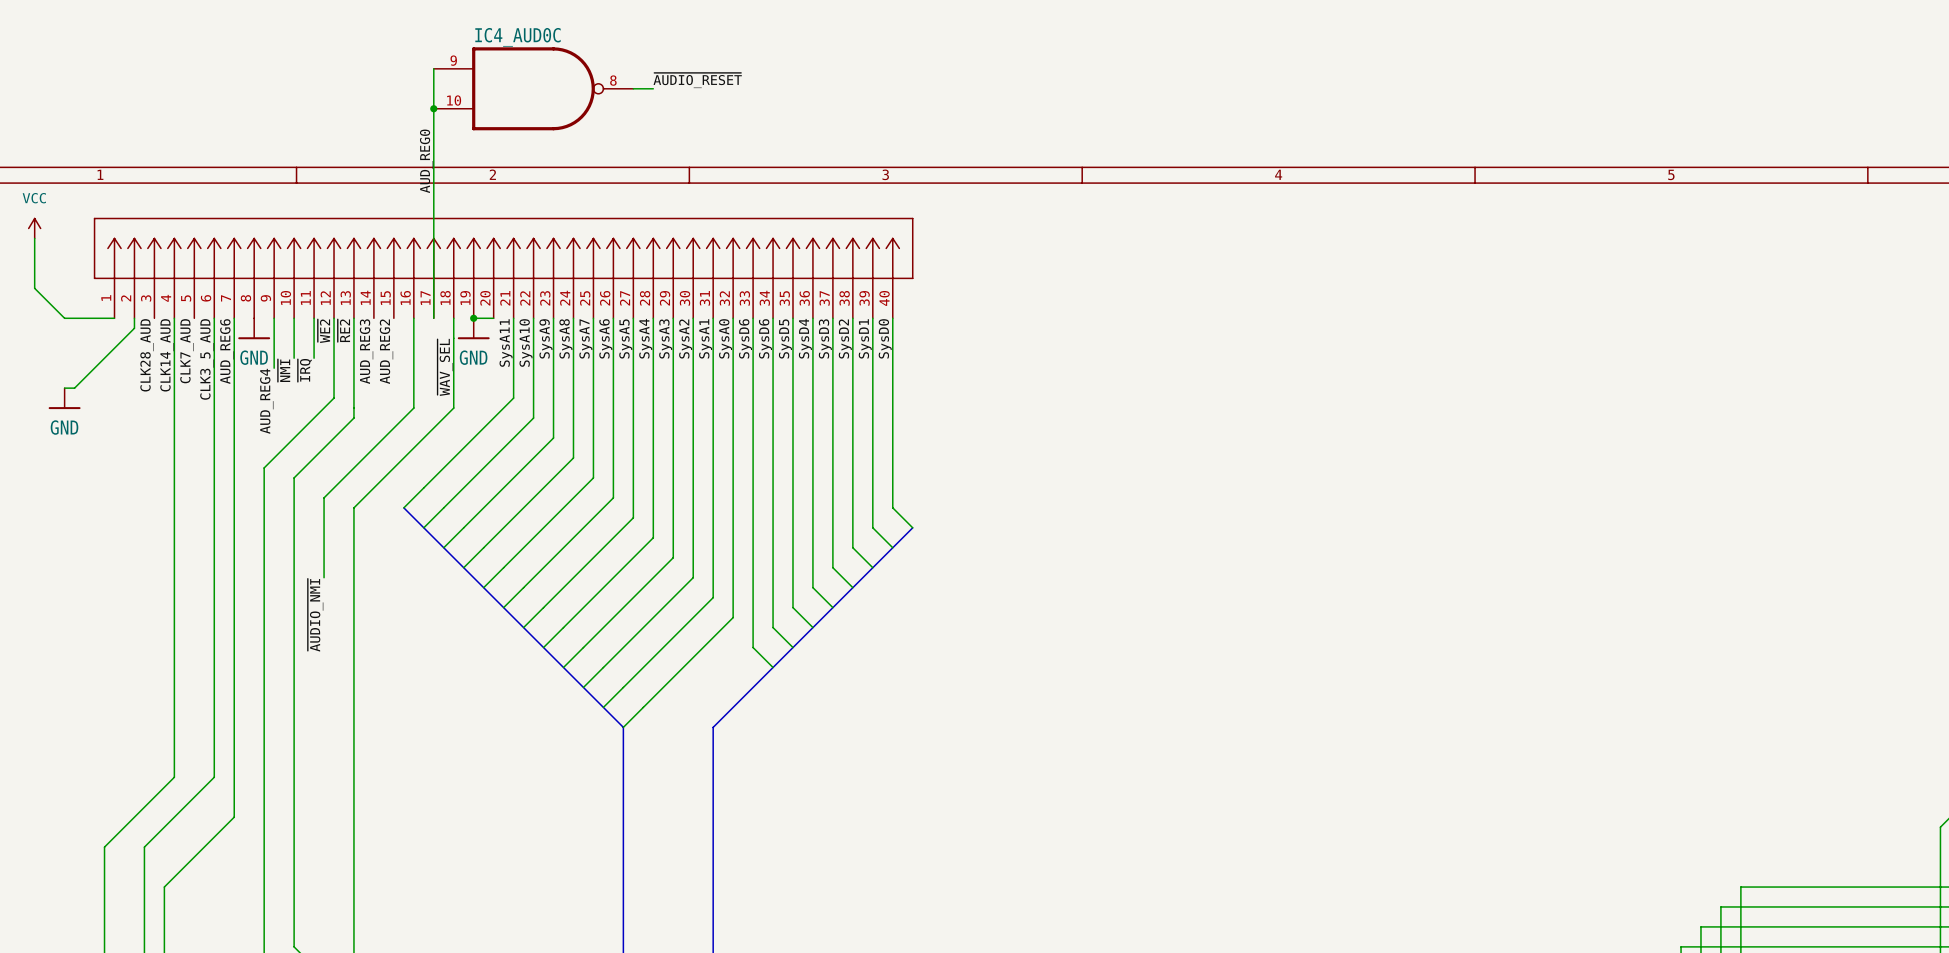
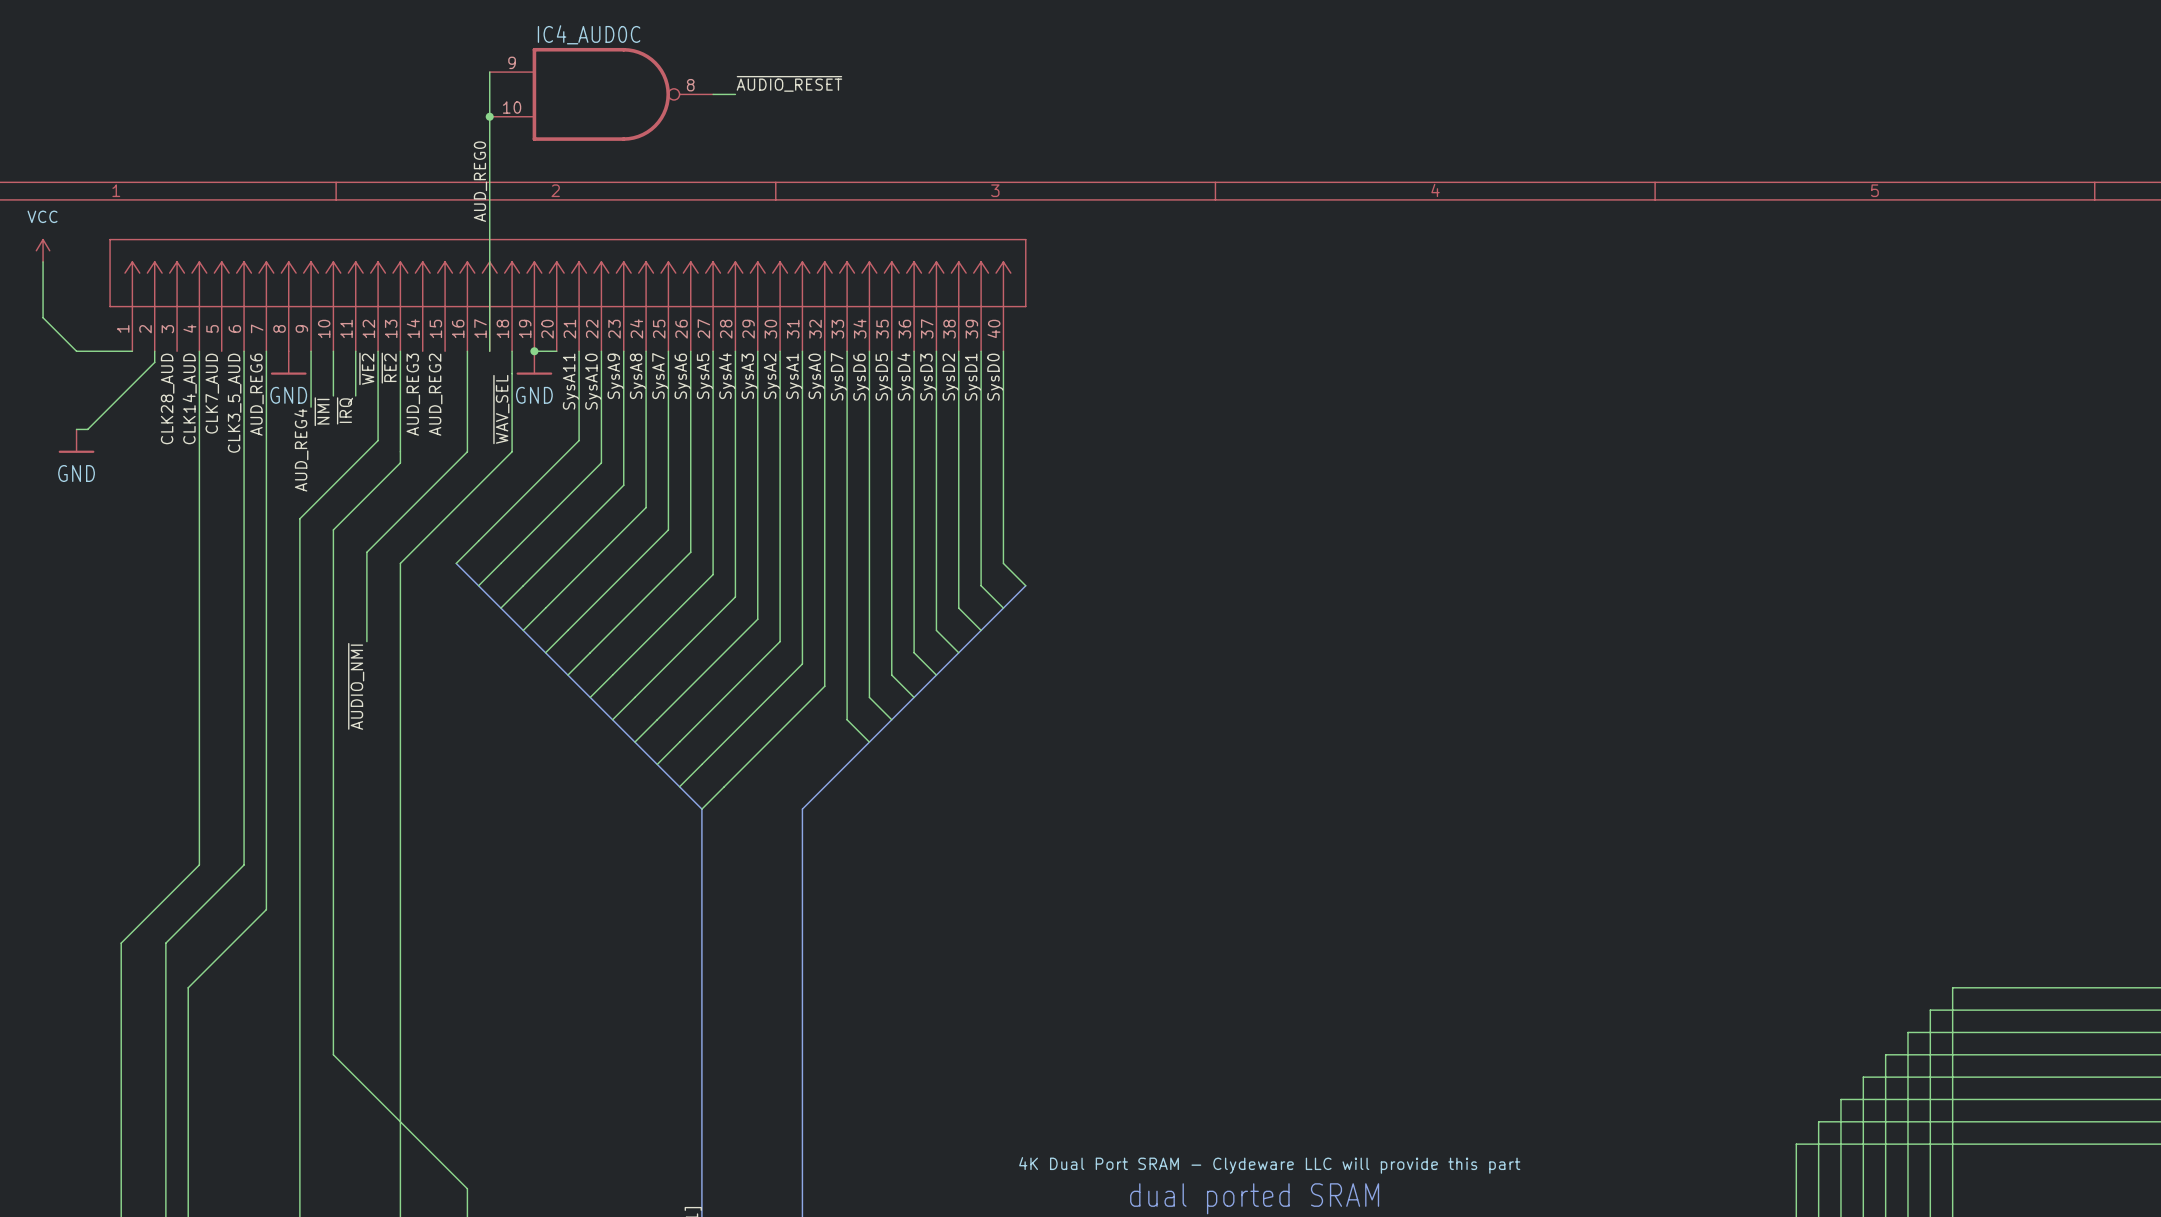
label: SysD6 (745, 338) -> SysD7 (838, 376)

